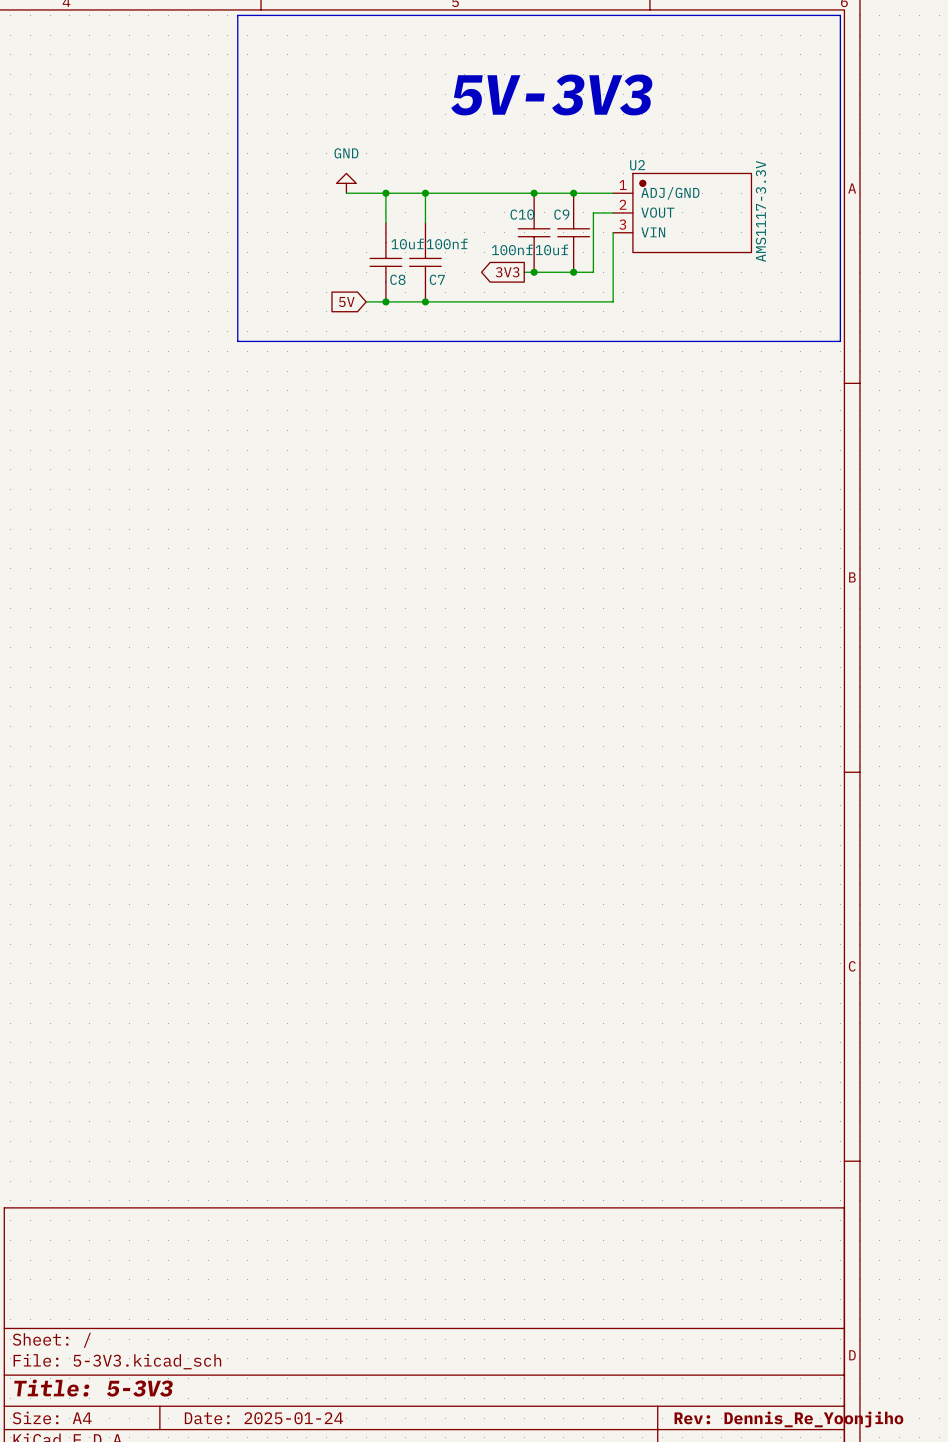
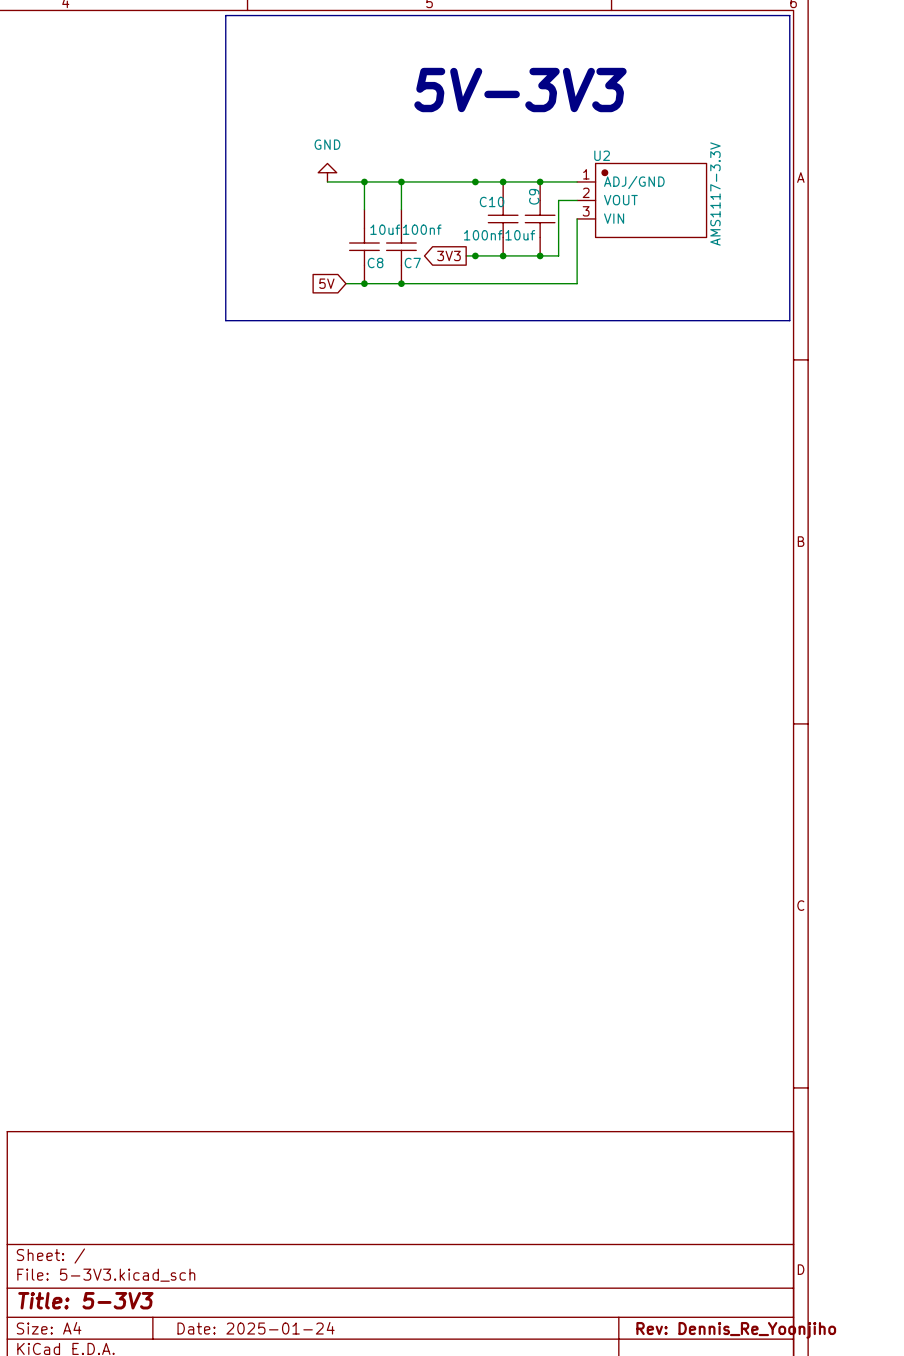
junction: none -> (475, 181)
C9 name rotation: 0° (561, 214) -> 90° counterclockwise (534, 196)
wire: none -> (466, 255) (493, 255)
junction: none -> (475, 255)
global label position: 3V3 (507, 272) -> 3V3 (448, 255)

